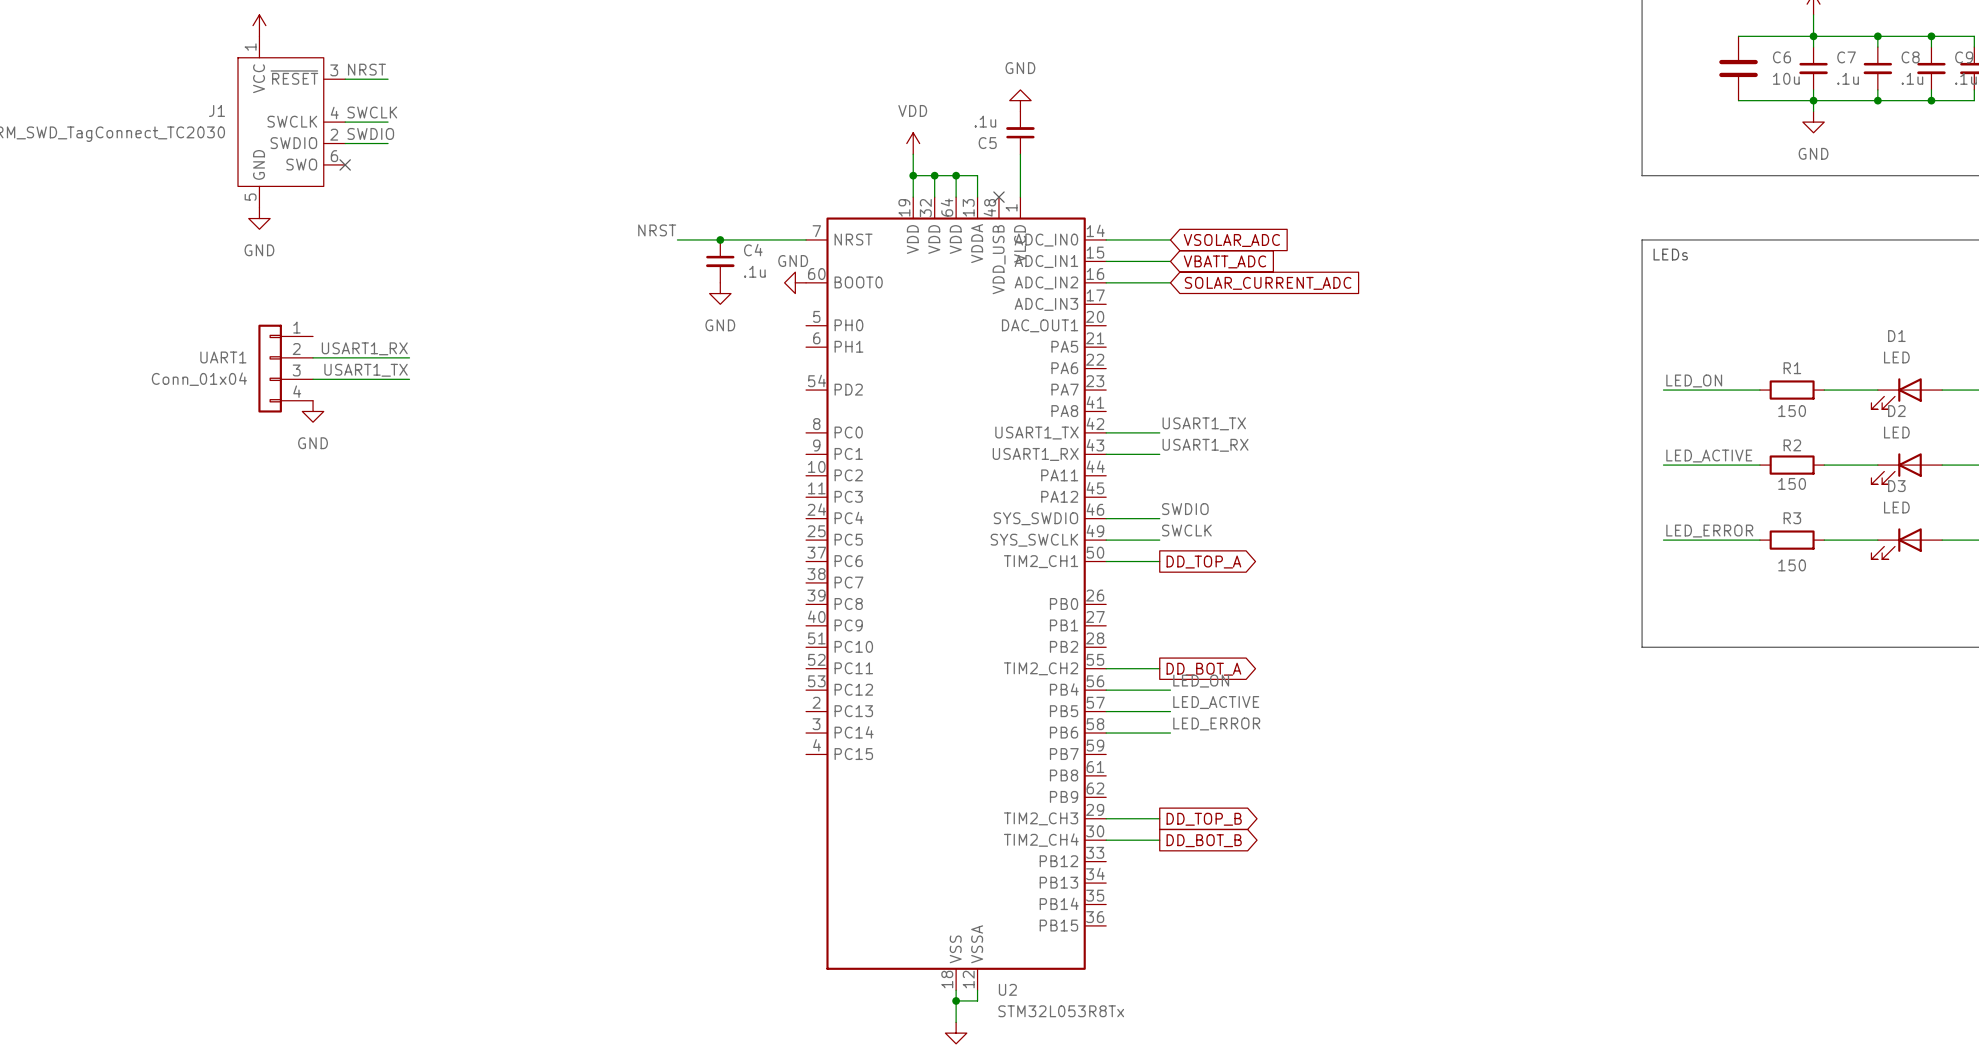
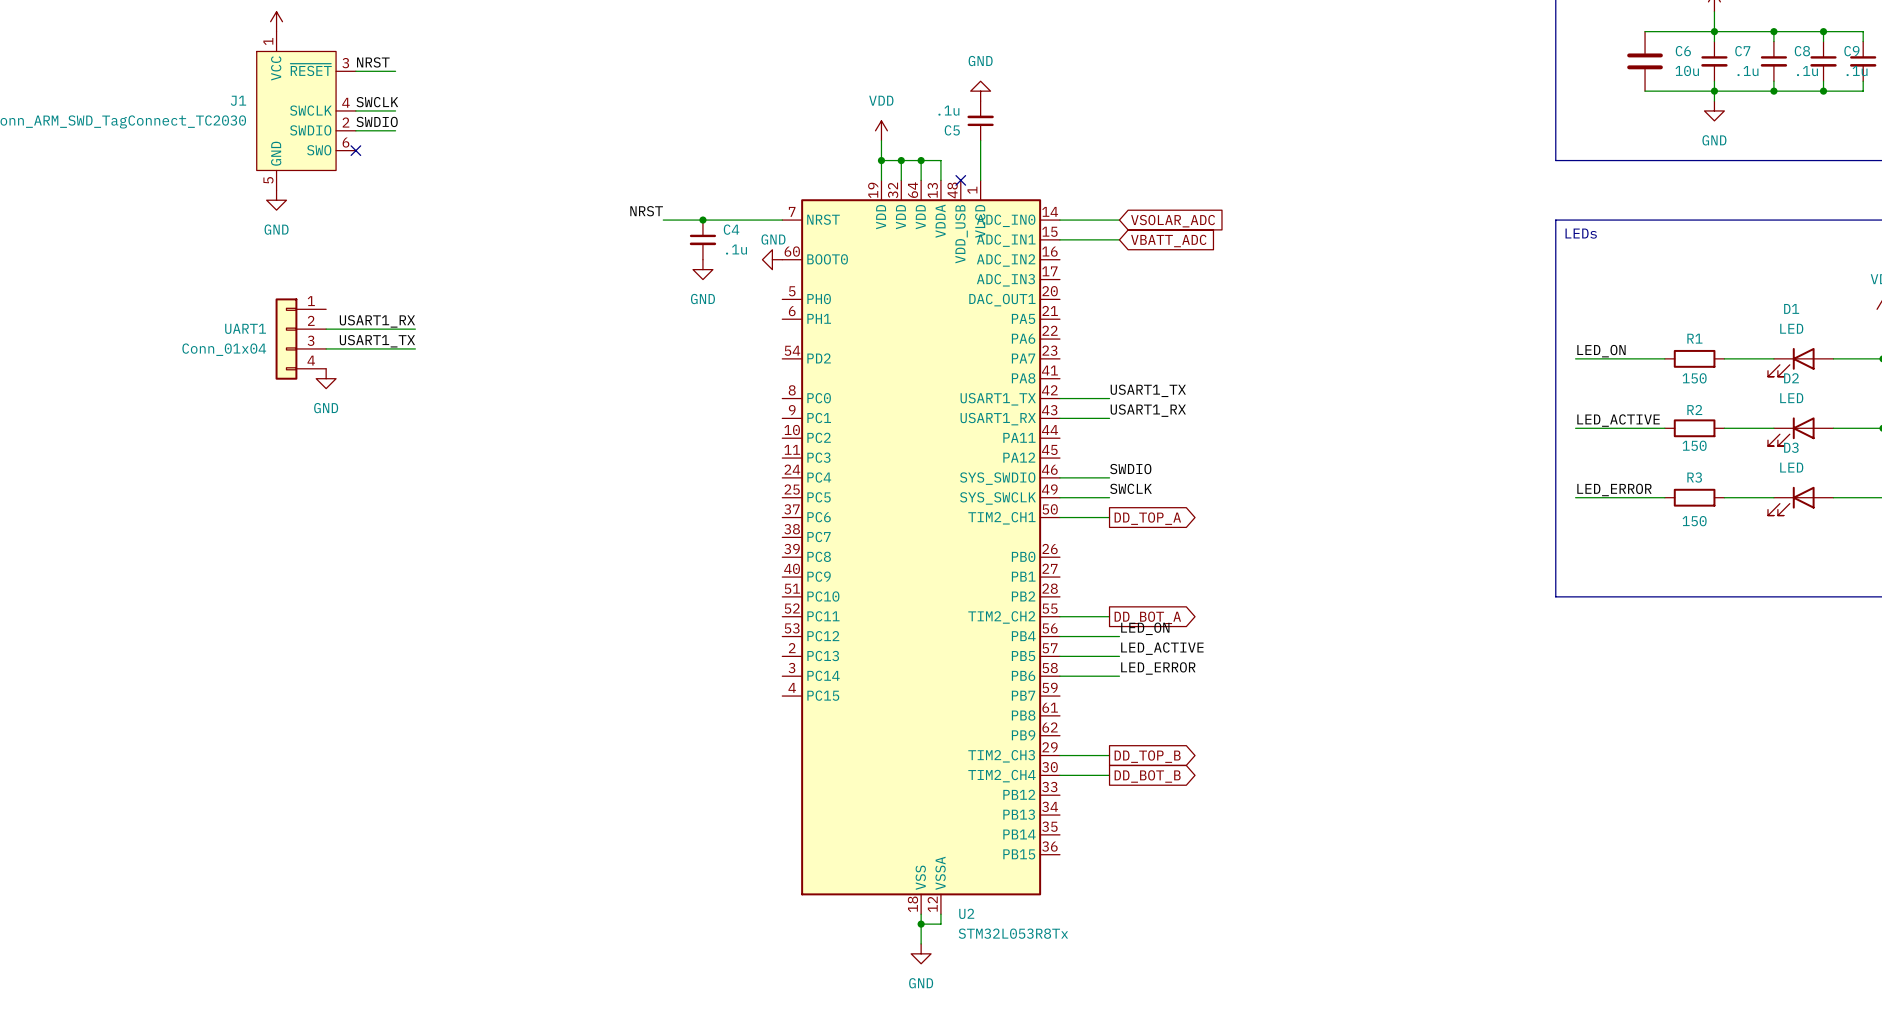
wire: (1106, 282) (1170, 282) -> none
global label: SOLAR_CURRENT_ADC (1268, 283) -> none

